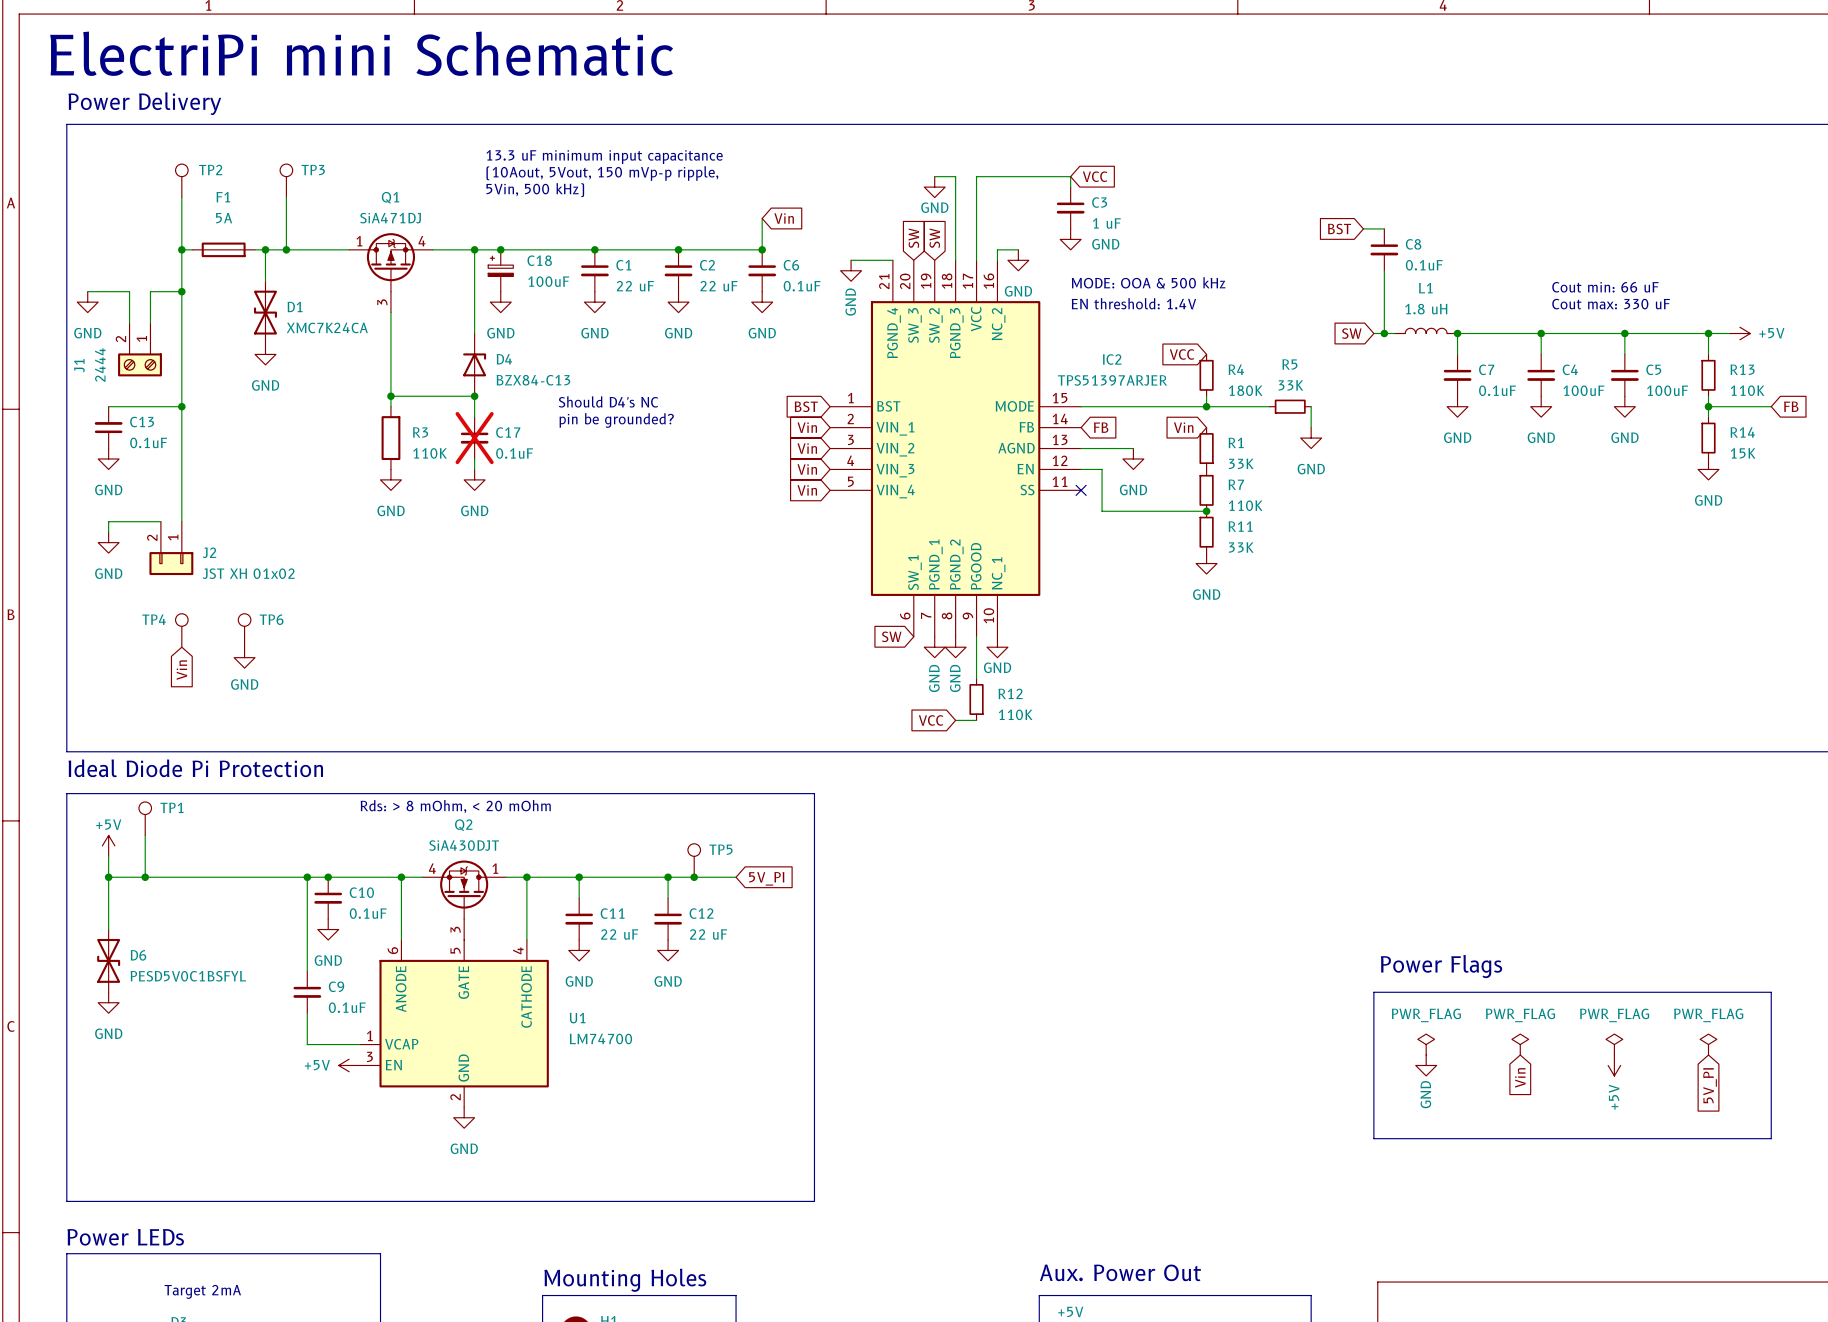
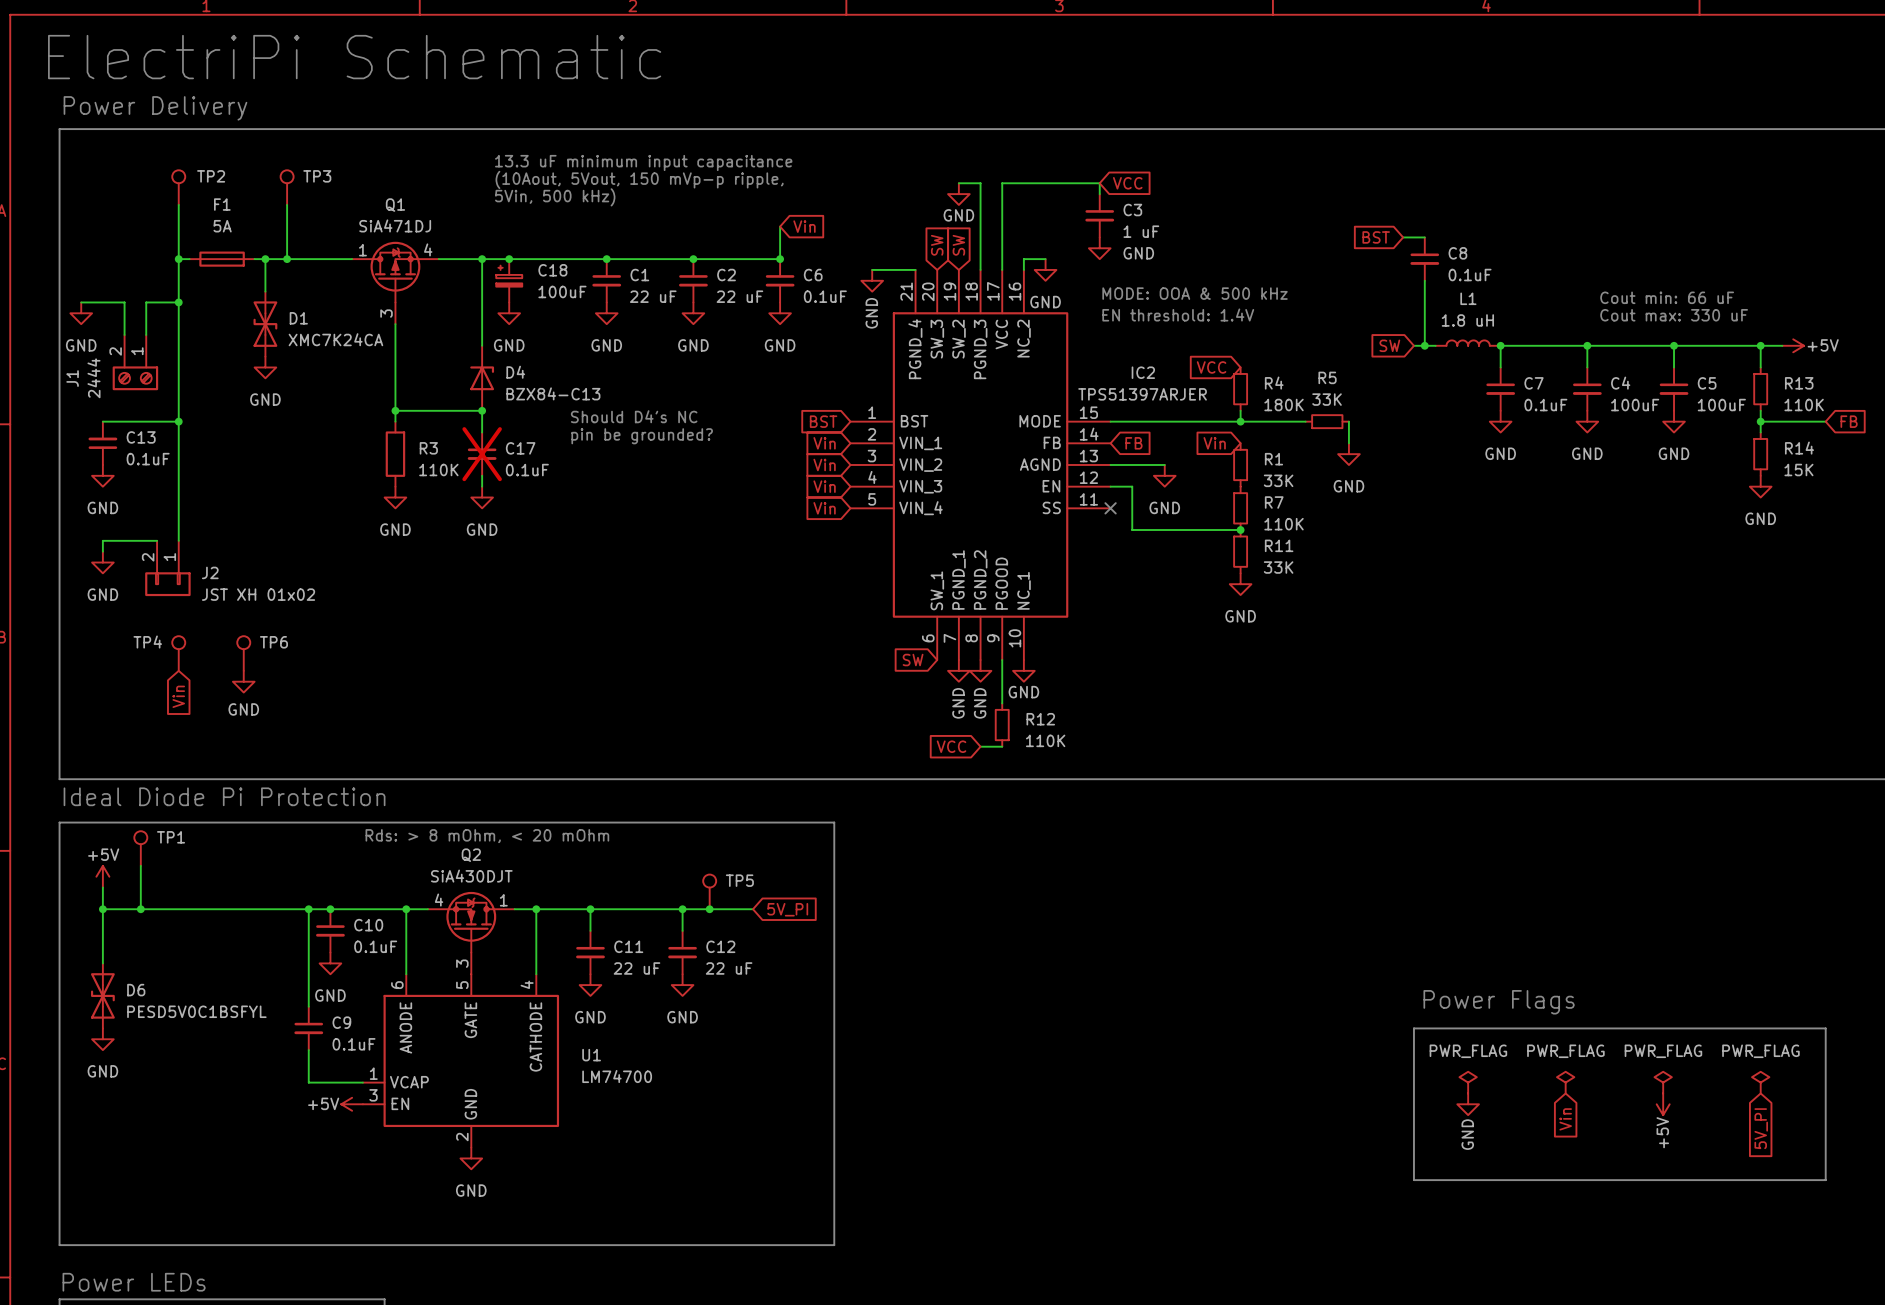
text: ElectriPi mini Schematic (361, 53) -> ElectriPi Schematic (354, 57)

